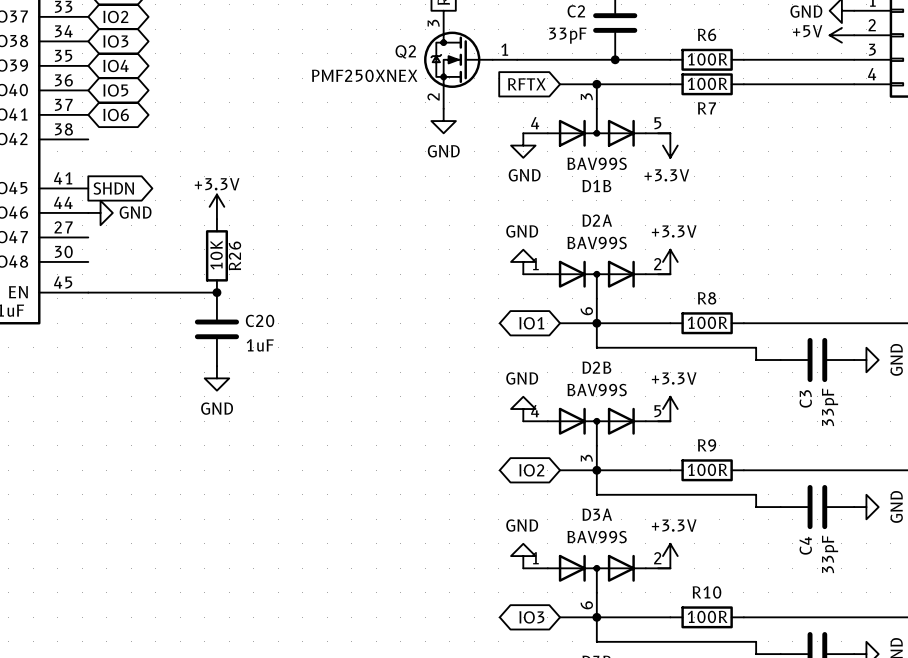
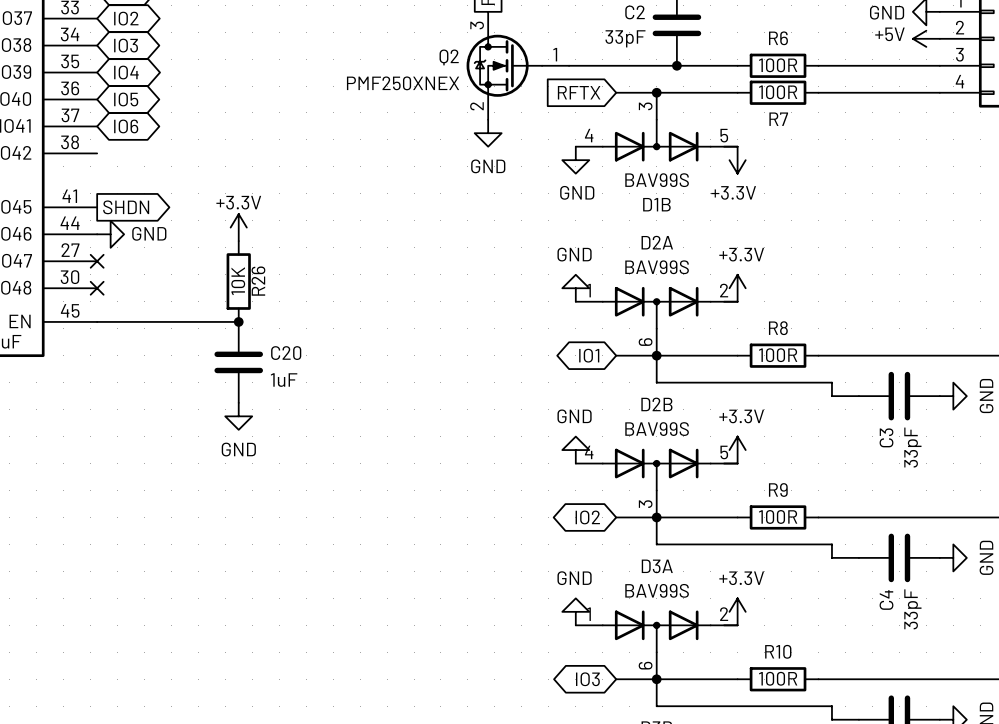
no-connect mark: none -> (97, 261)
no-connect mark: none -> (97, 288)

